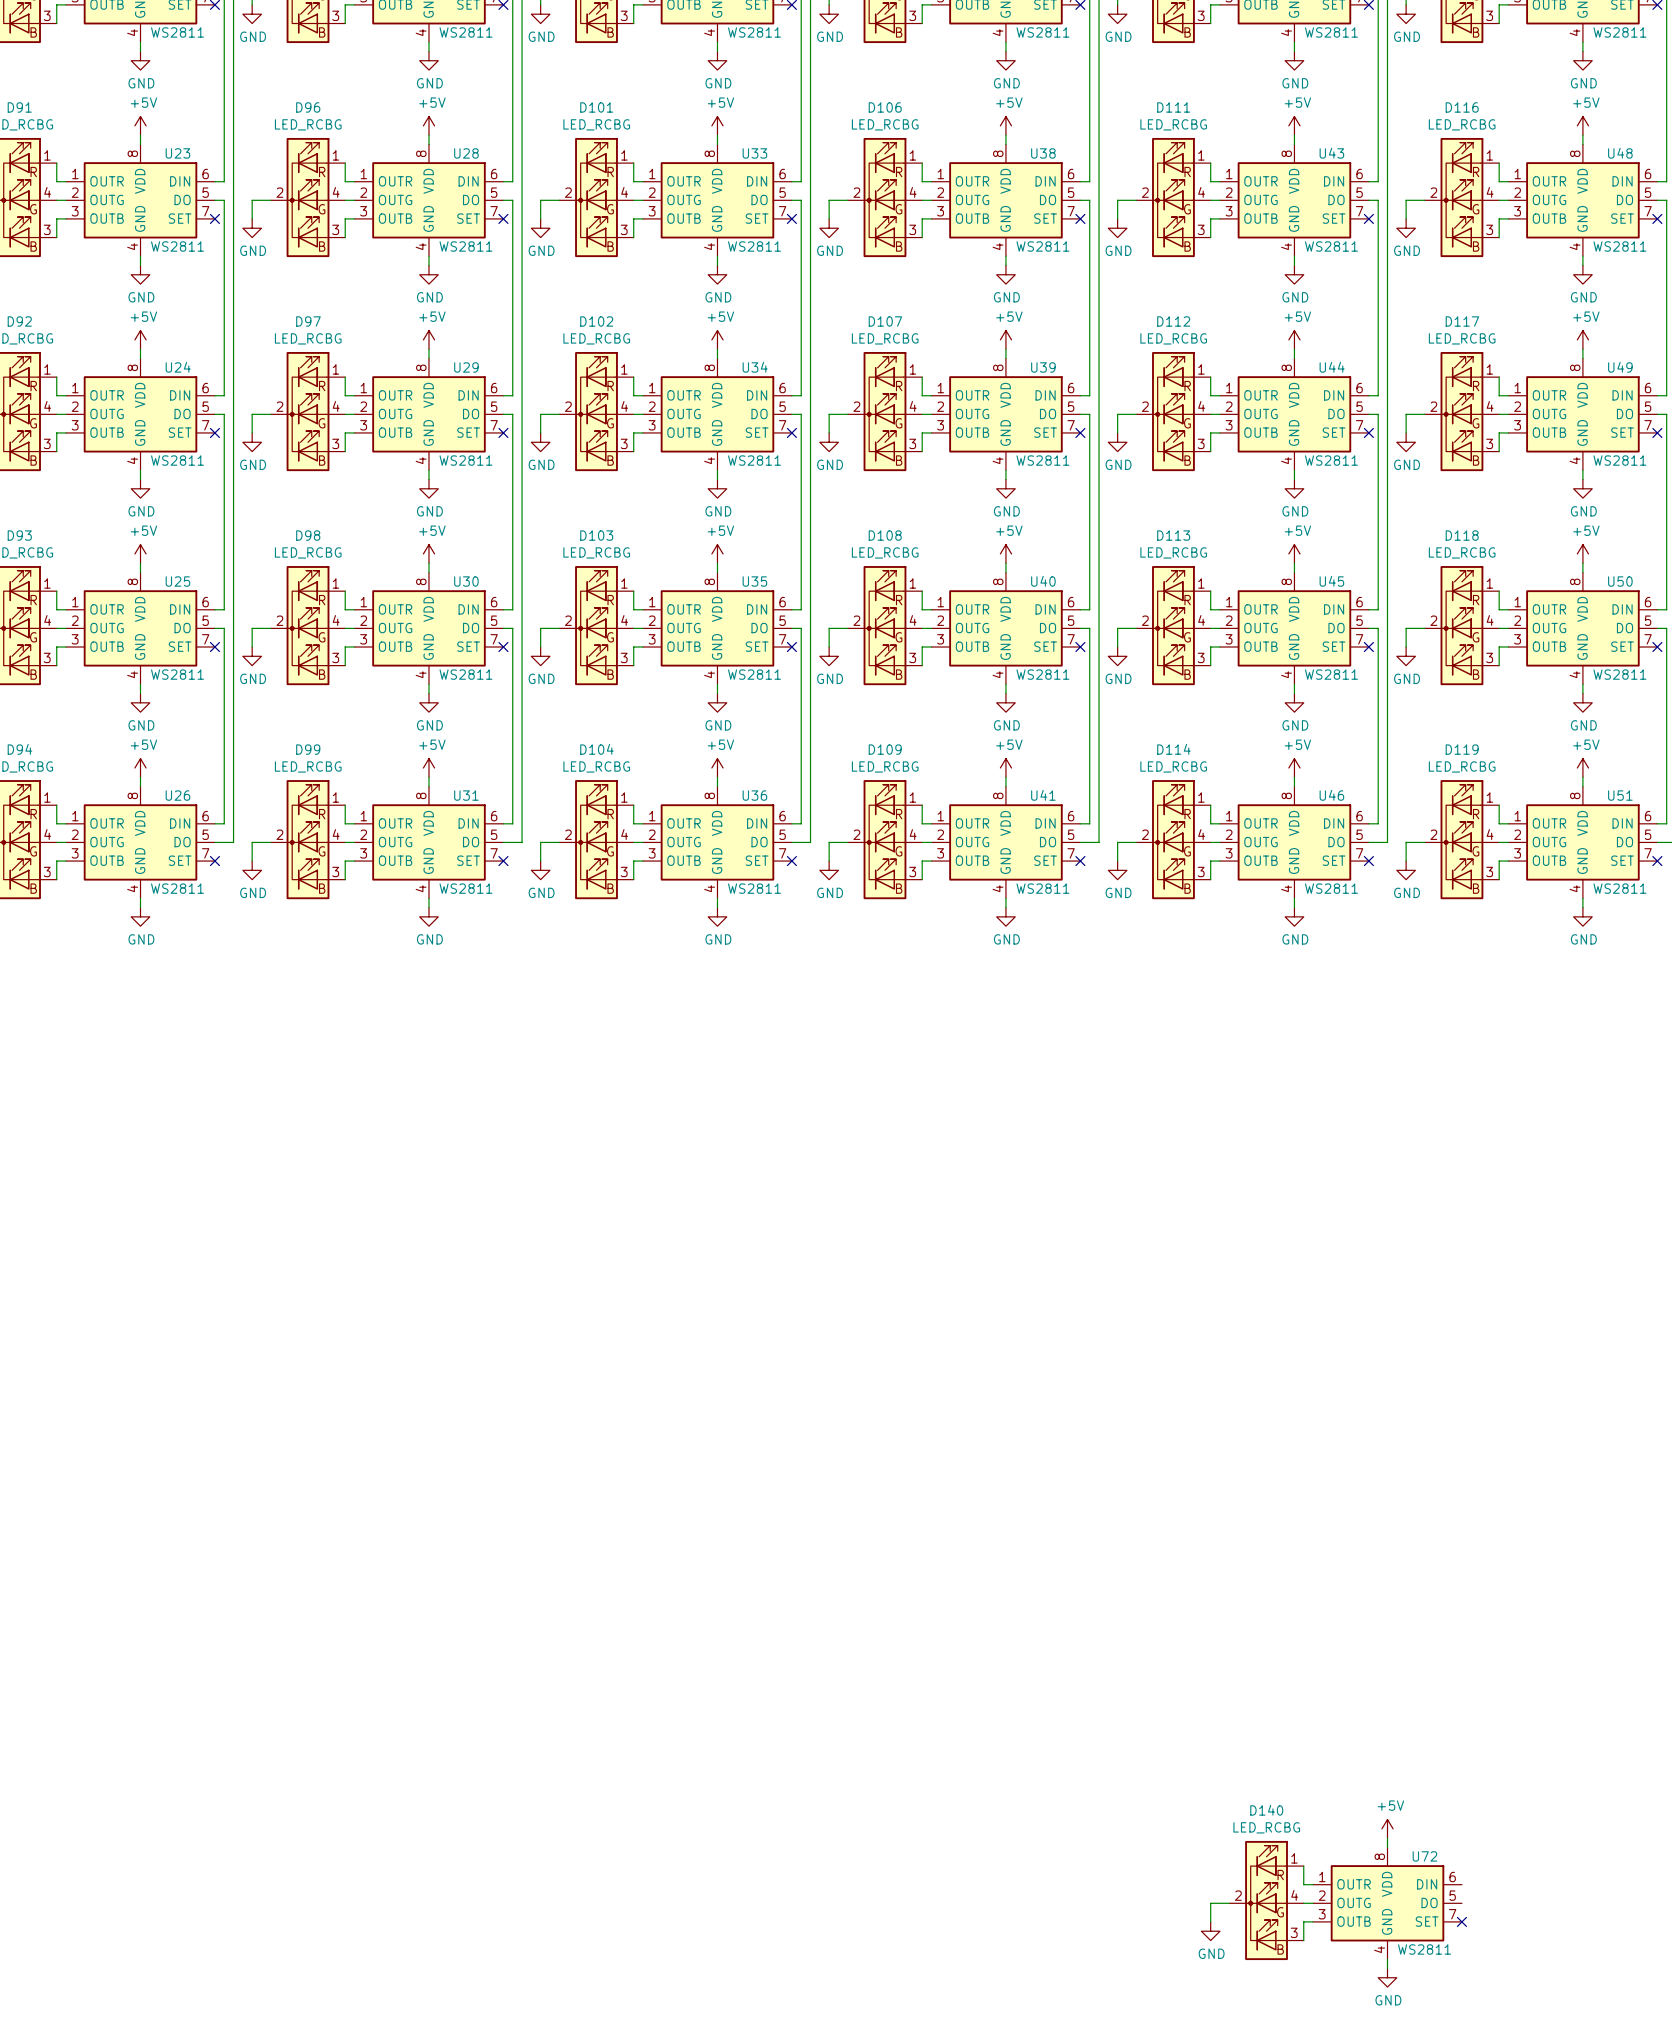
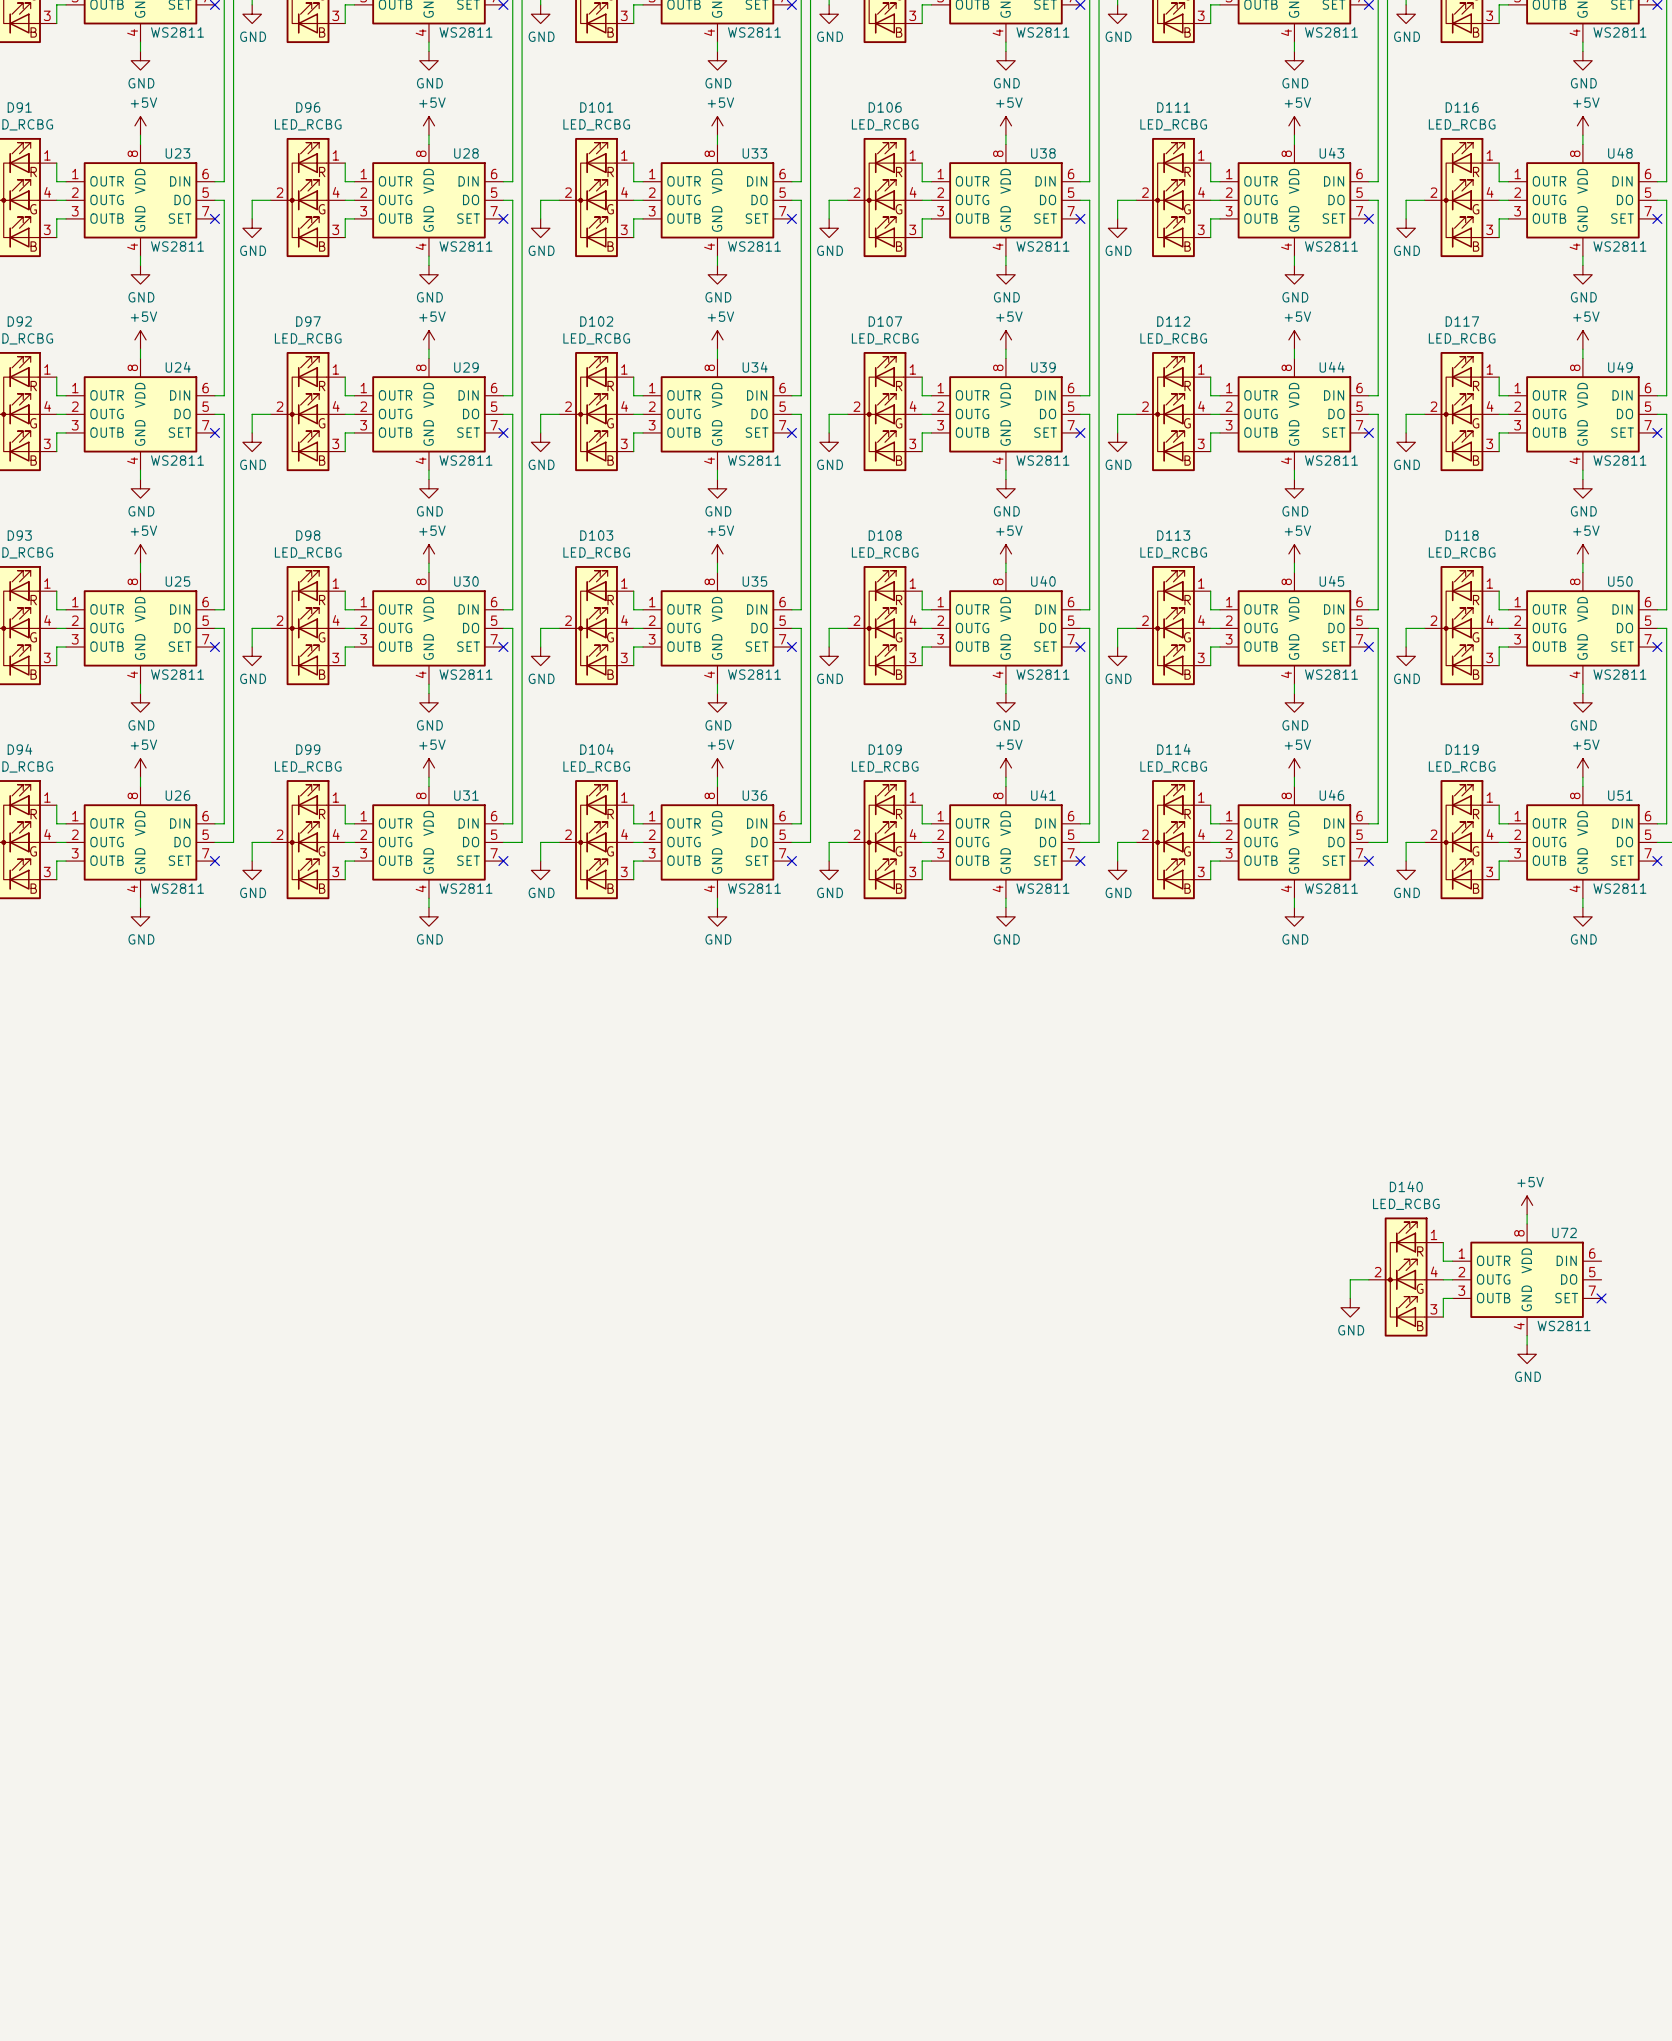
power symbol: none -> +5V (1527, 1205)
wire: none -> (1527, 1214) (1527, 1223)
wire: none -> (1443, 1242) (1443, 1261) (1452, 1261)
wire: none -> (1368, 1279) (1350, 1279) (1350, 1298)
wire: none -> (1443, 1279) (1452, 1279)
wire: none -> (1452, 1298) (1443, 1298) (1443, 1317)
no-connect mark: none -> (1601, 1298)
power symbol: none -> GND (1350, 1307)
wire: none -> (1527, 1335) (1527, 1344)
power symbol: none -> GND (1527, 1354)
power symbol: +5V (1387, 1828) -> none
wire: (1387, 1838) (1387, 1847) -> none
wire: (1303, 1866) (1303, 1884) (1313, 1884) -> none
D140 position: (1266, 1900) -> (1406, 1277)
wire: (1229, 1903) (1210, 1903) (1210, 1921) -> none
wire: (1303, 1903) (1313, 1903) -> none
U72 position: (1387, 1903) -> (1527, 1279)
wire: (1313, 1921) (1303, 1921) (1303, 1940) -> none
no-connect mark: (1461, 1921) -> none
power symbol: GND (1210, 1931) -> none
wire: (1387, 1959) (1387, 1968) -> none
power symbol: GND (1387, 1977) -> none

